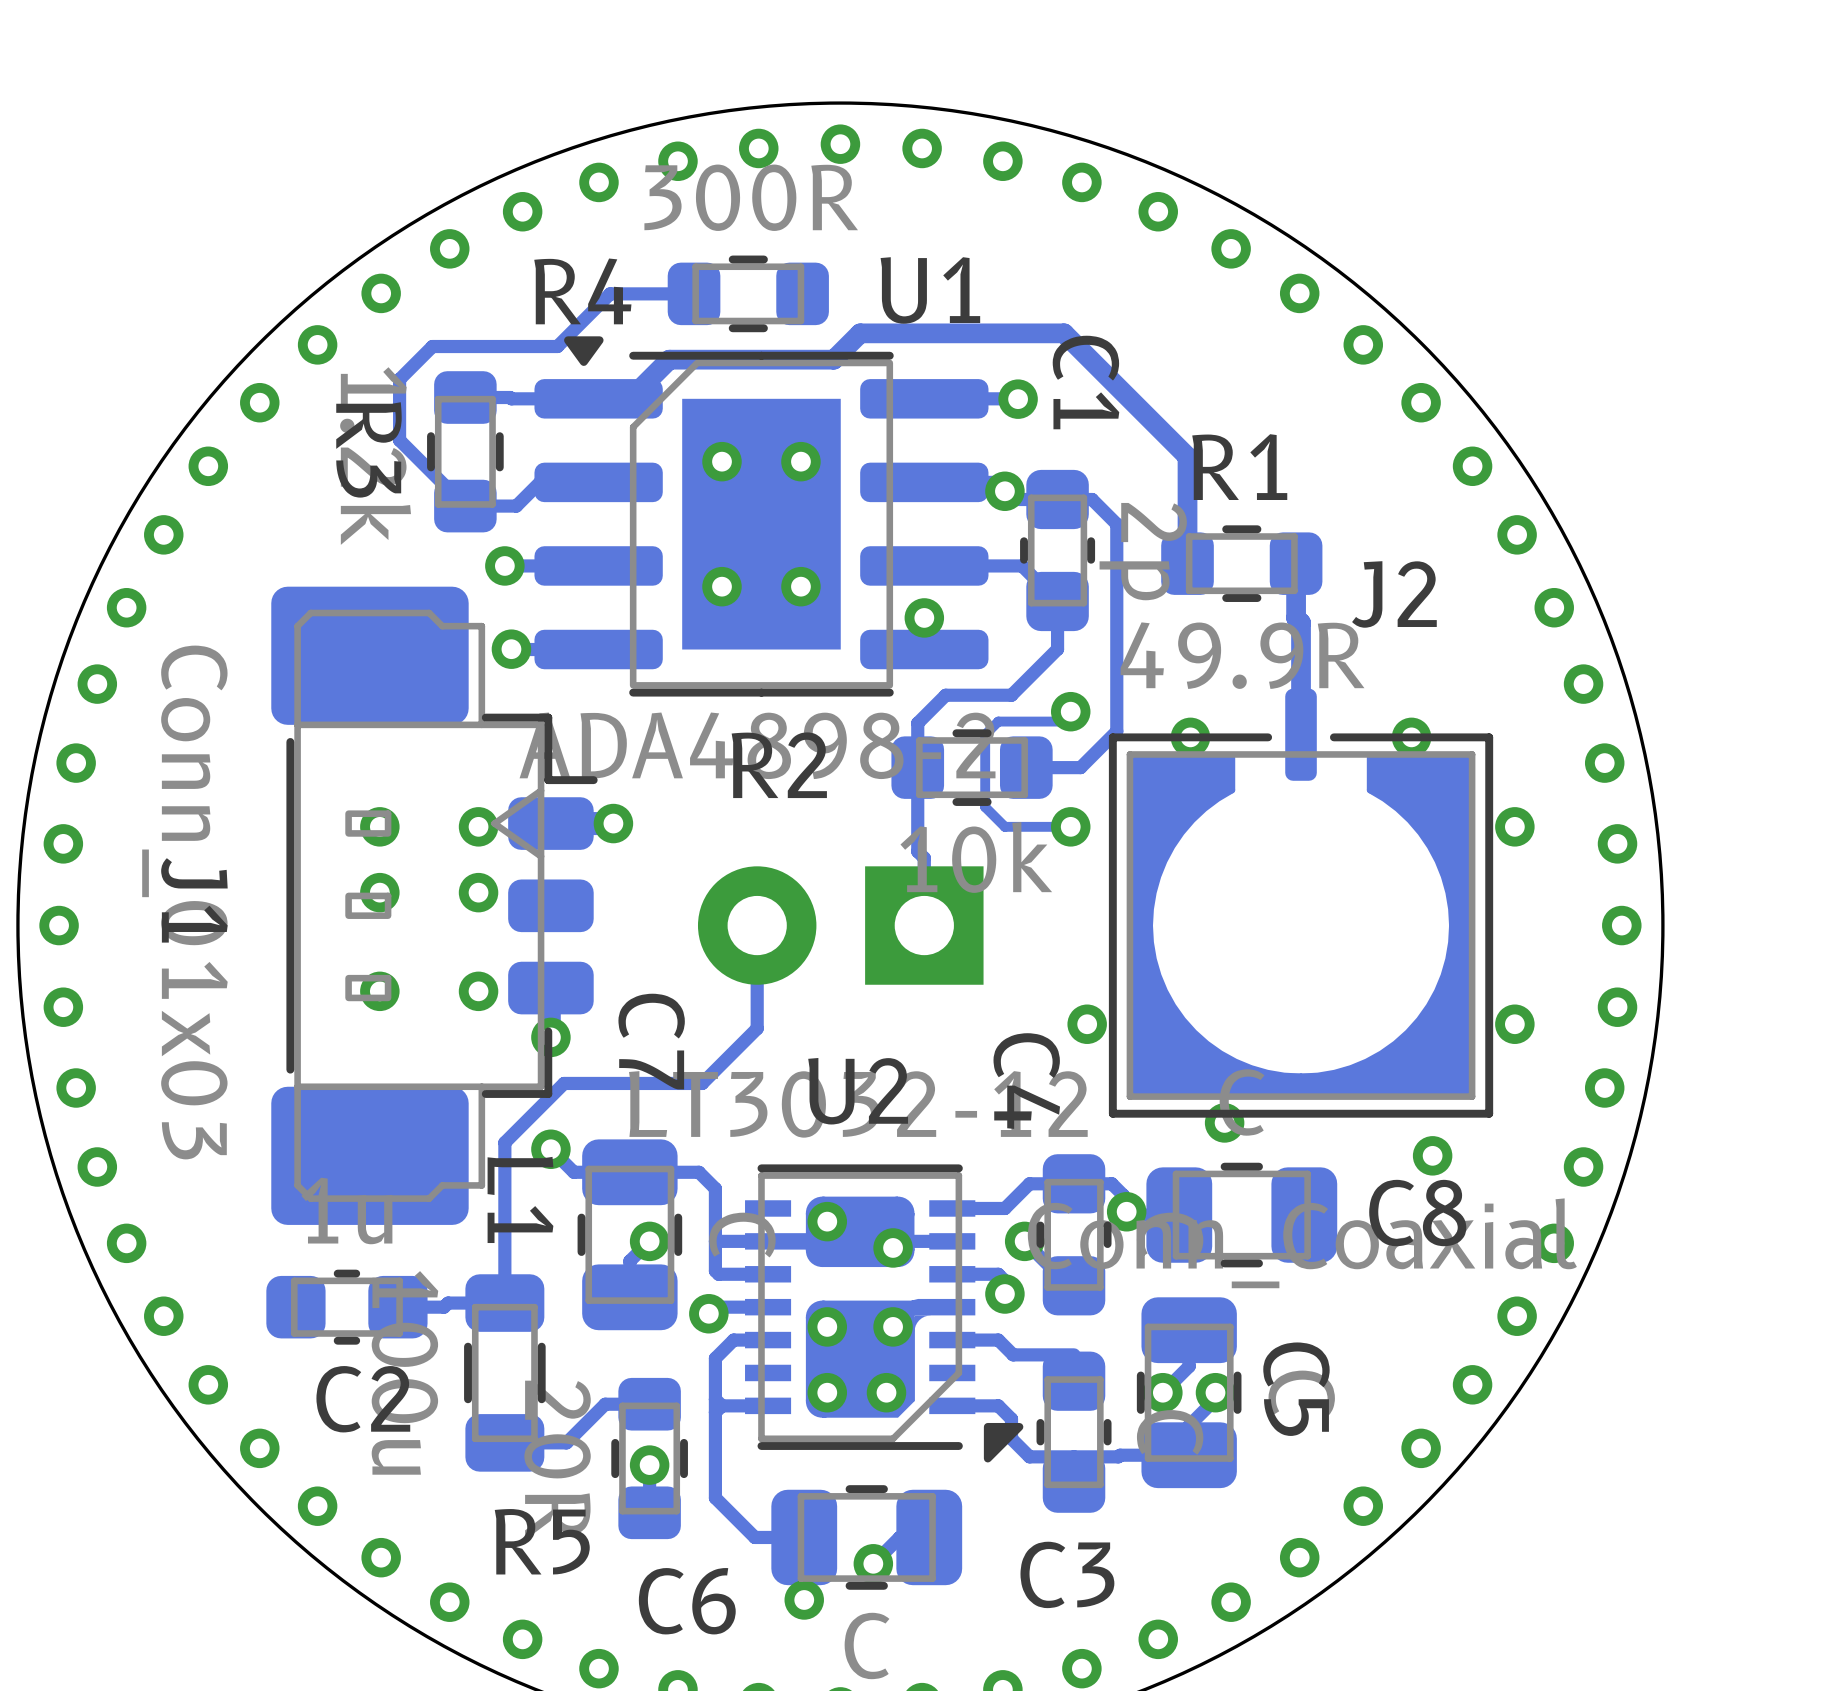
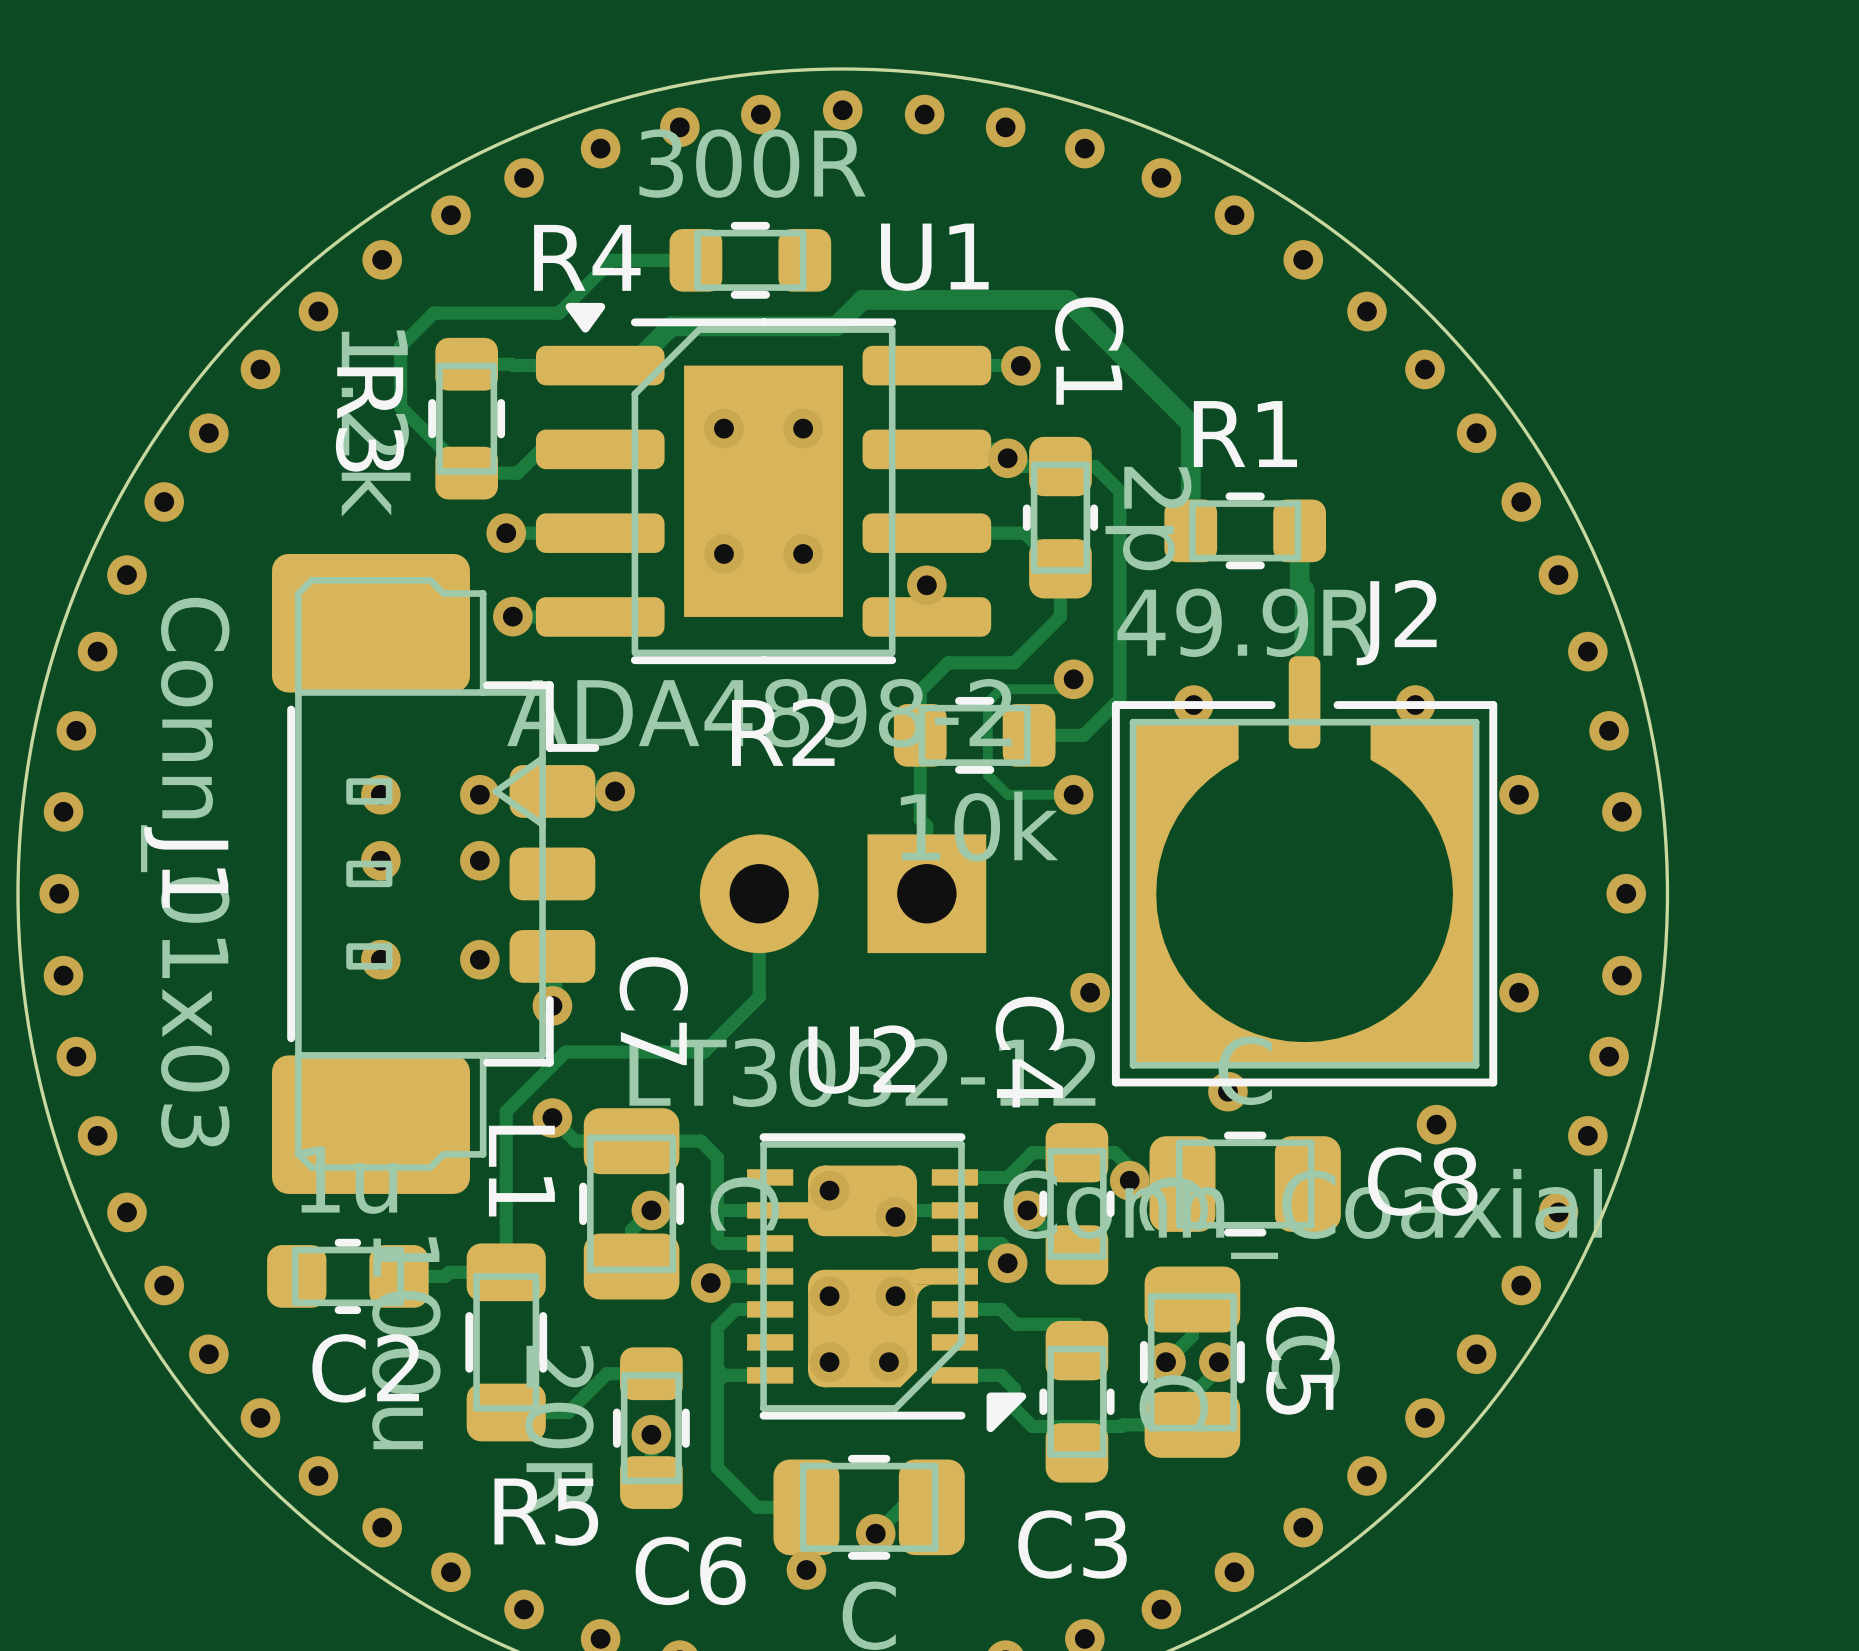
J2 name position: J2 (1394, 594) -> J2 (1396, 622)

